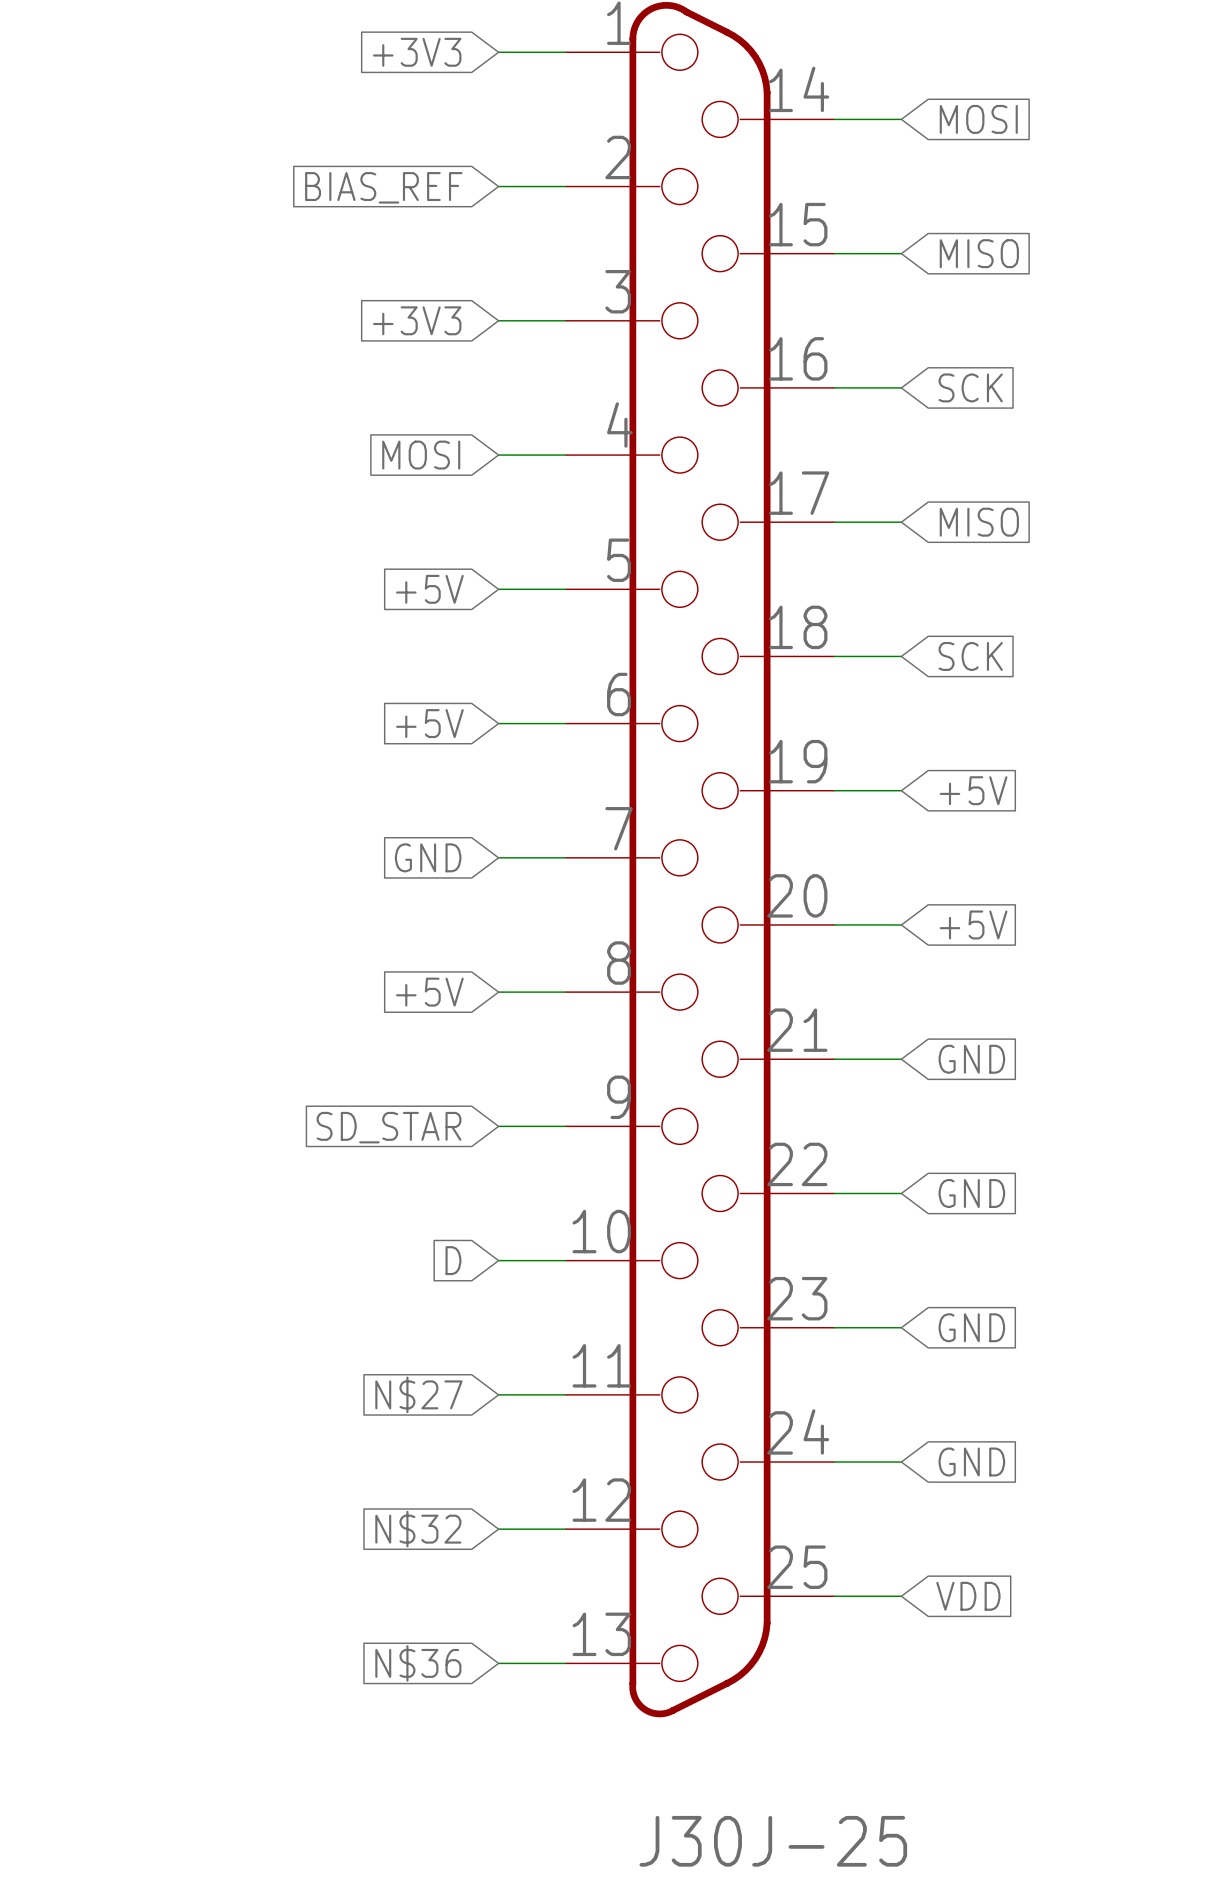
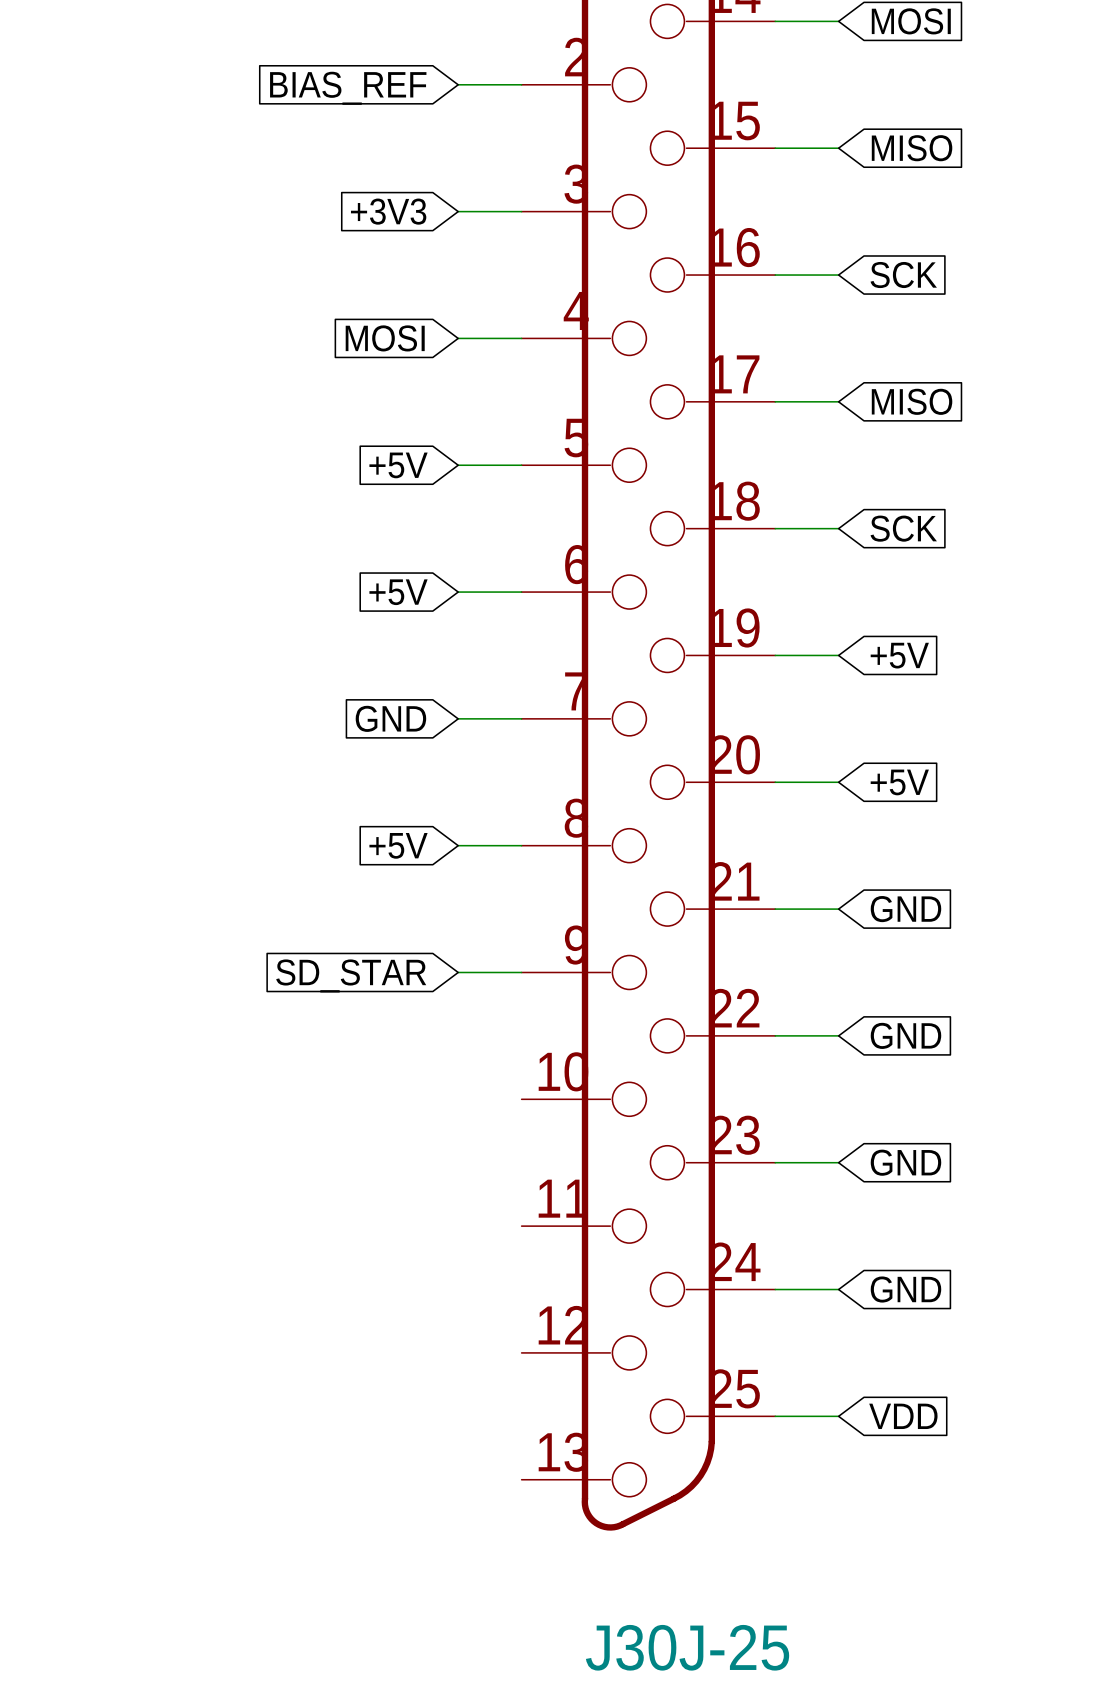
global label: D (453, 1260) -> none
wire: (498, 1260) (565, 1260) -> none
global label: N$27 (418, 1394) -> none
wire: (498, 1394) (565, 1394) -> none
global label: N$32 (418, 1529) -> none
wire: (498, 1529) (565, 1529) -> none
global label: N$36 (418, 1663) -> none
wire: (498, 1663) (565, 1663) -> none

